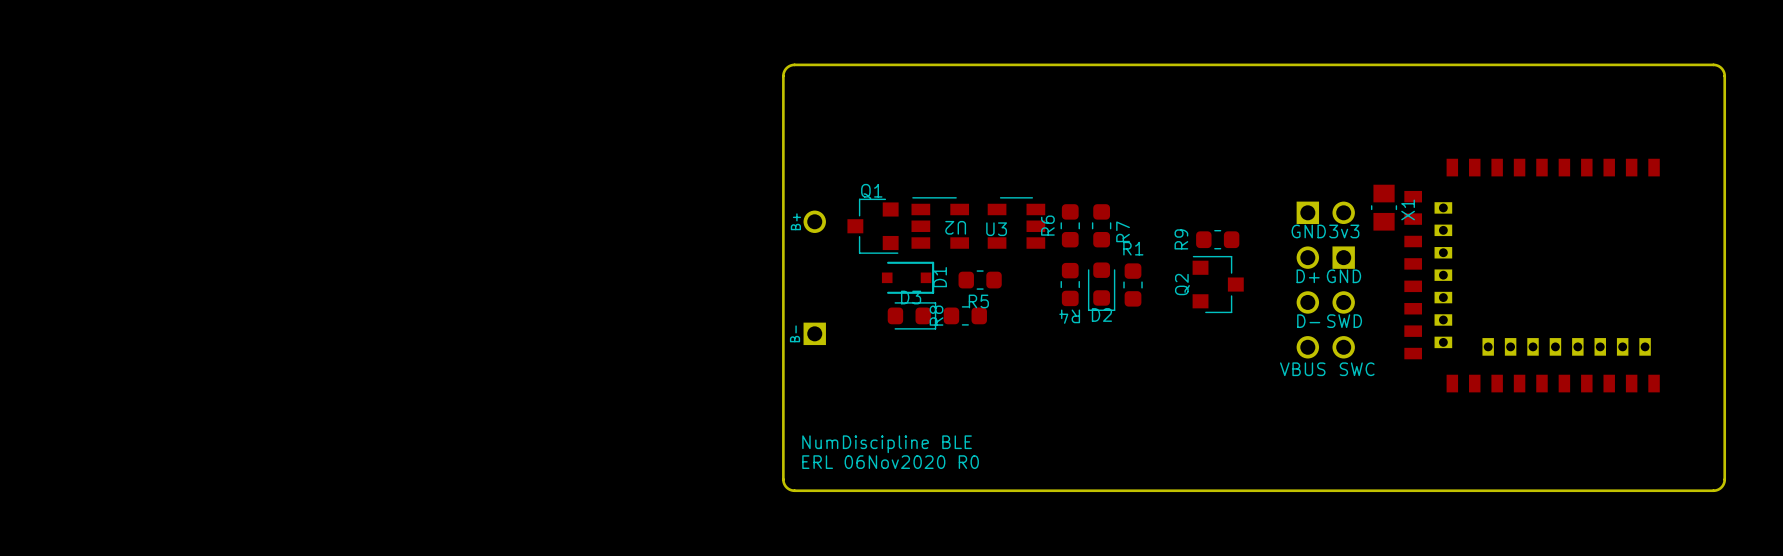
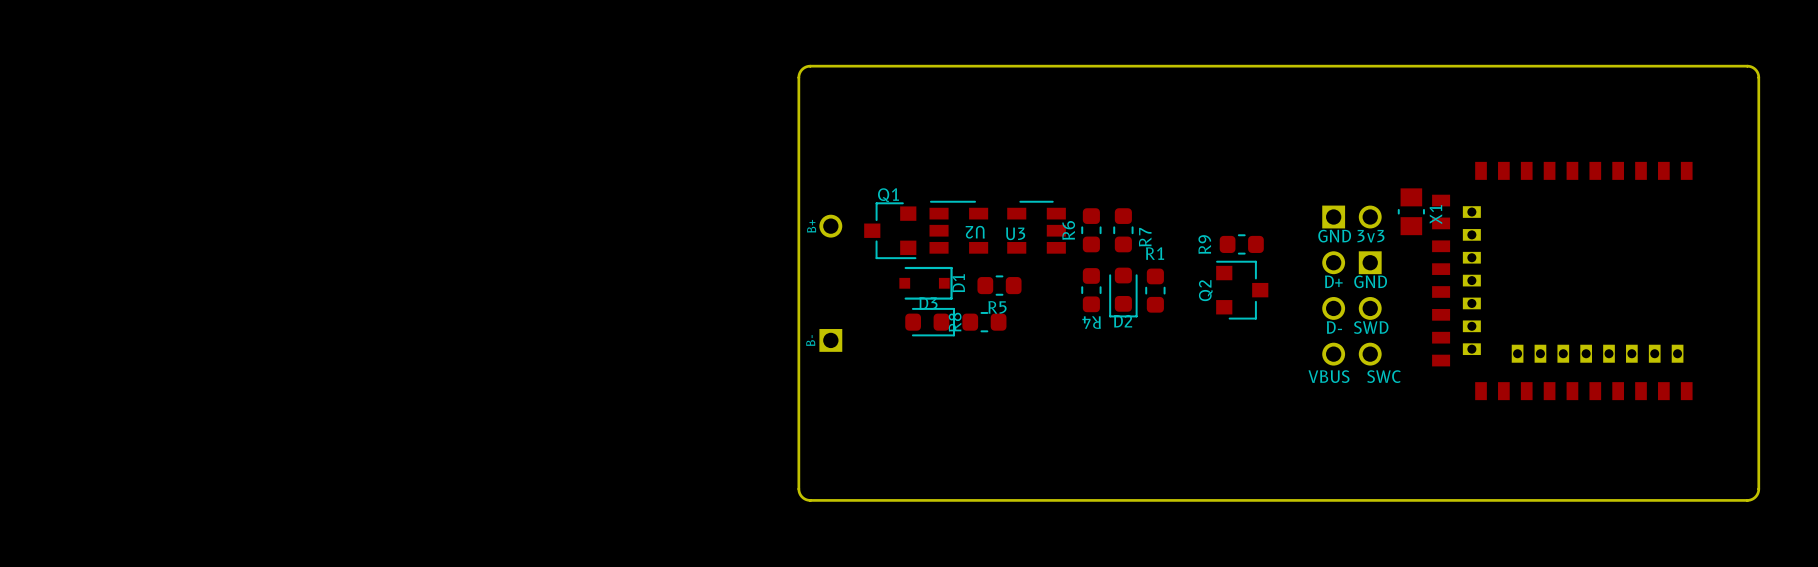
text: NumDiscipline BLE (887, 444) -> none
text: ERL 06Nov2020 R0 (890, 462) -> none

